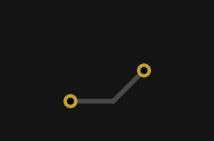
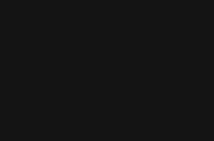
track: (144, 70) (113, 101) (70, 101) -> none
via: (144, 70) -> none
via: (70, 101) -> none

